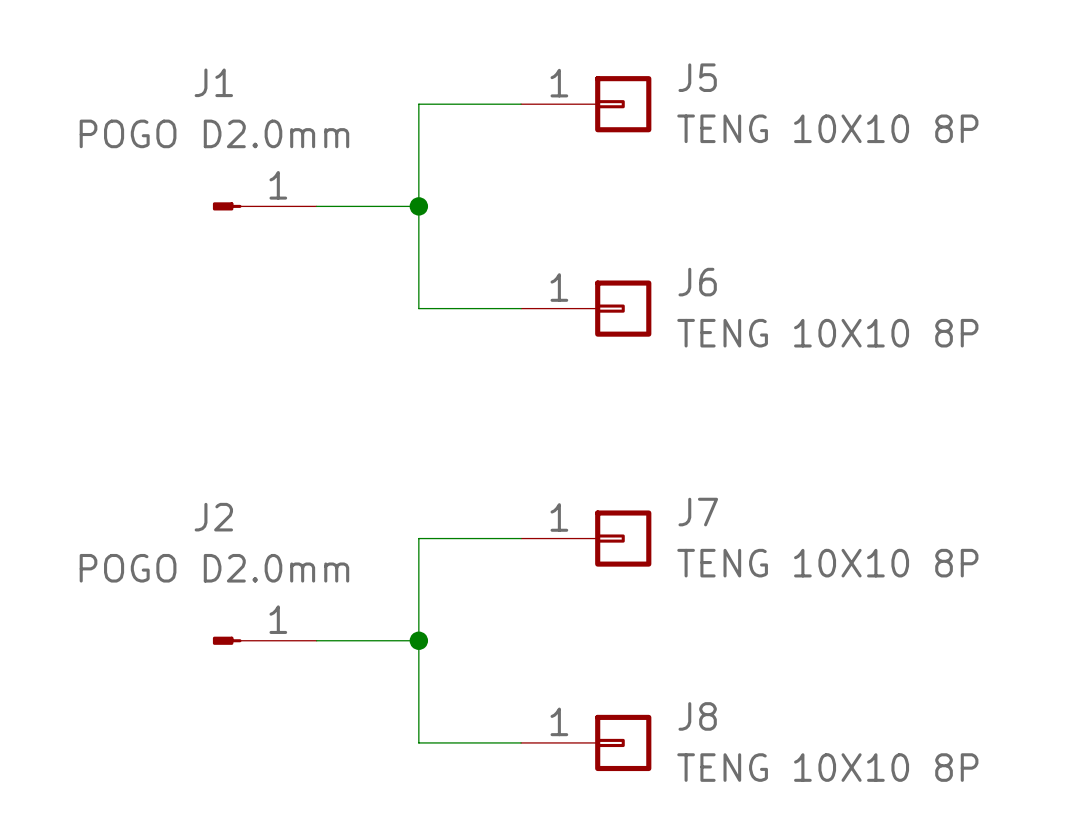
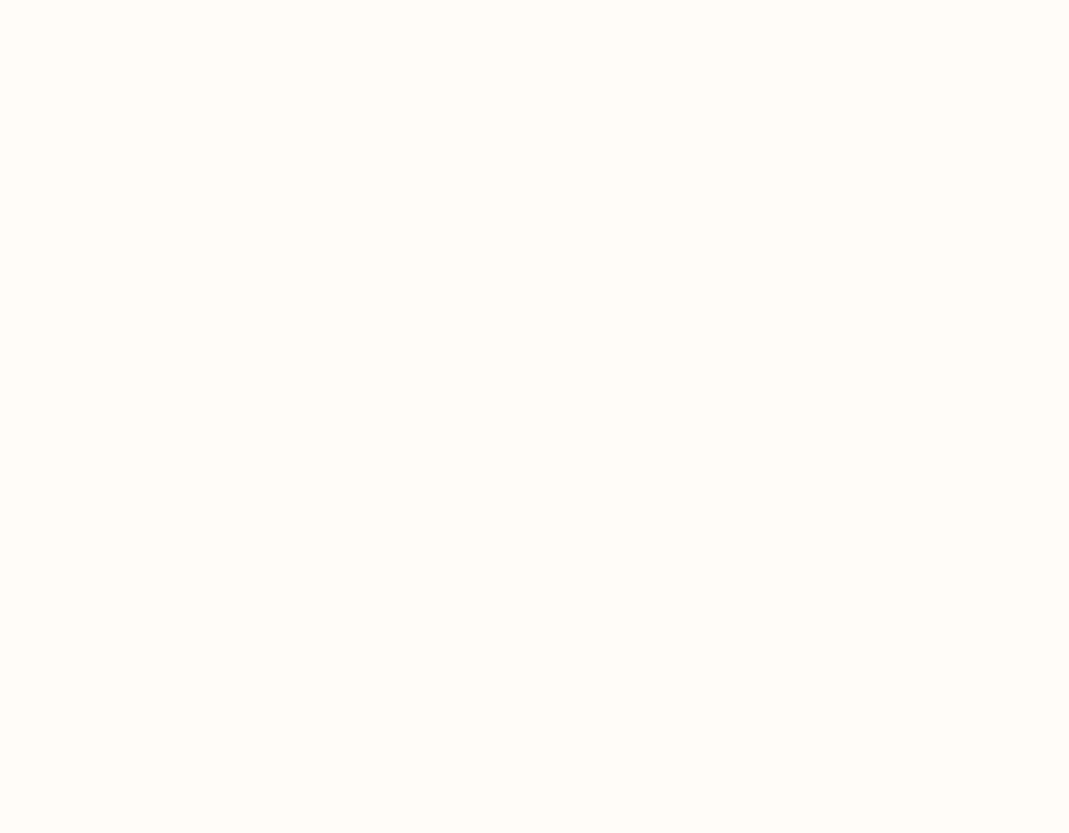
wire: (521, 104) (418, 104) (418, 308) (521, 308) -> none
J5: TENG 10X10 8P (586, 104) -> none
J1: POGO D2.0mm (264, 206) -> none
wire: (316, 206) (418, 206) -> none
junction: (418, 206) -> none
J6: TENG 10X10 8P (586, 308) -> none
wire: (521, 538) (418, 538) (418, 742) (521, 742) -> none
J7: TENG 10X10 8P (586, 538) -> none
J2: POGO D2.0mm (264, 640) -> none
wire: (316, 640) (418, 640) -> none
junction: (418, 640) -> none
J8: TENG 10X10 8P (586, 742) -> none

